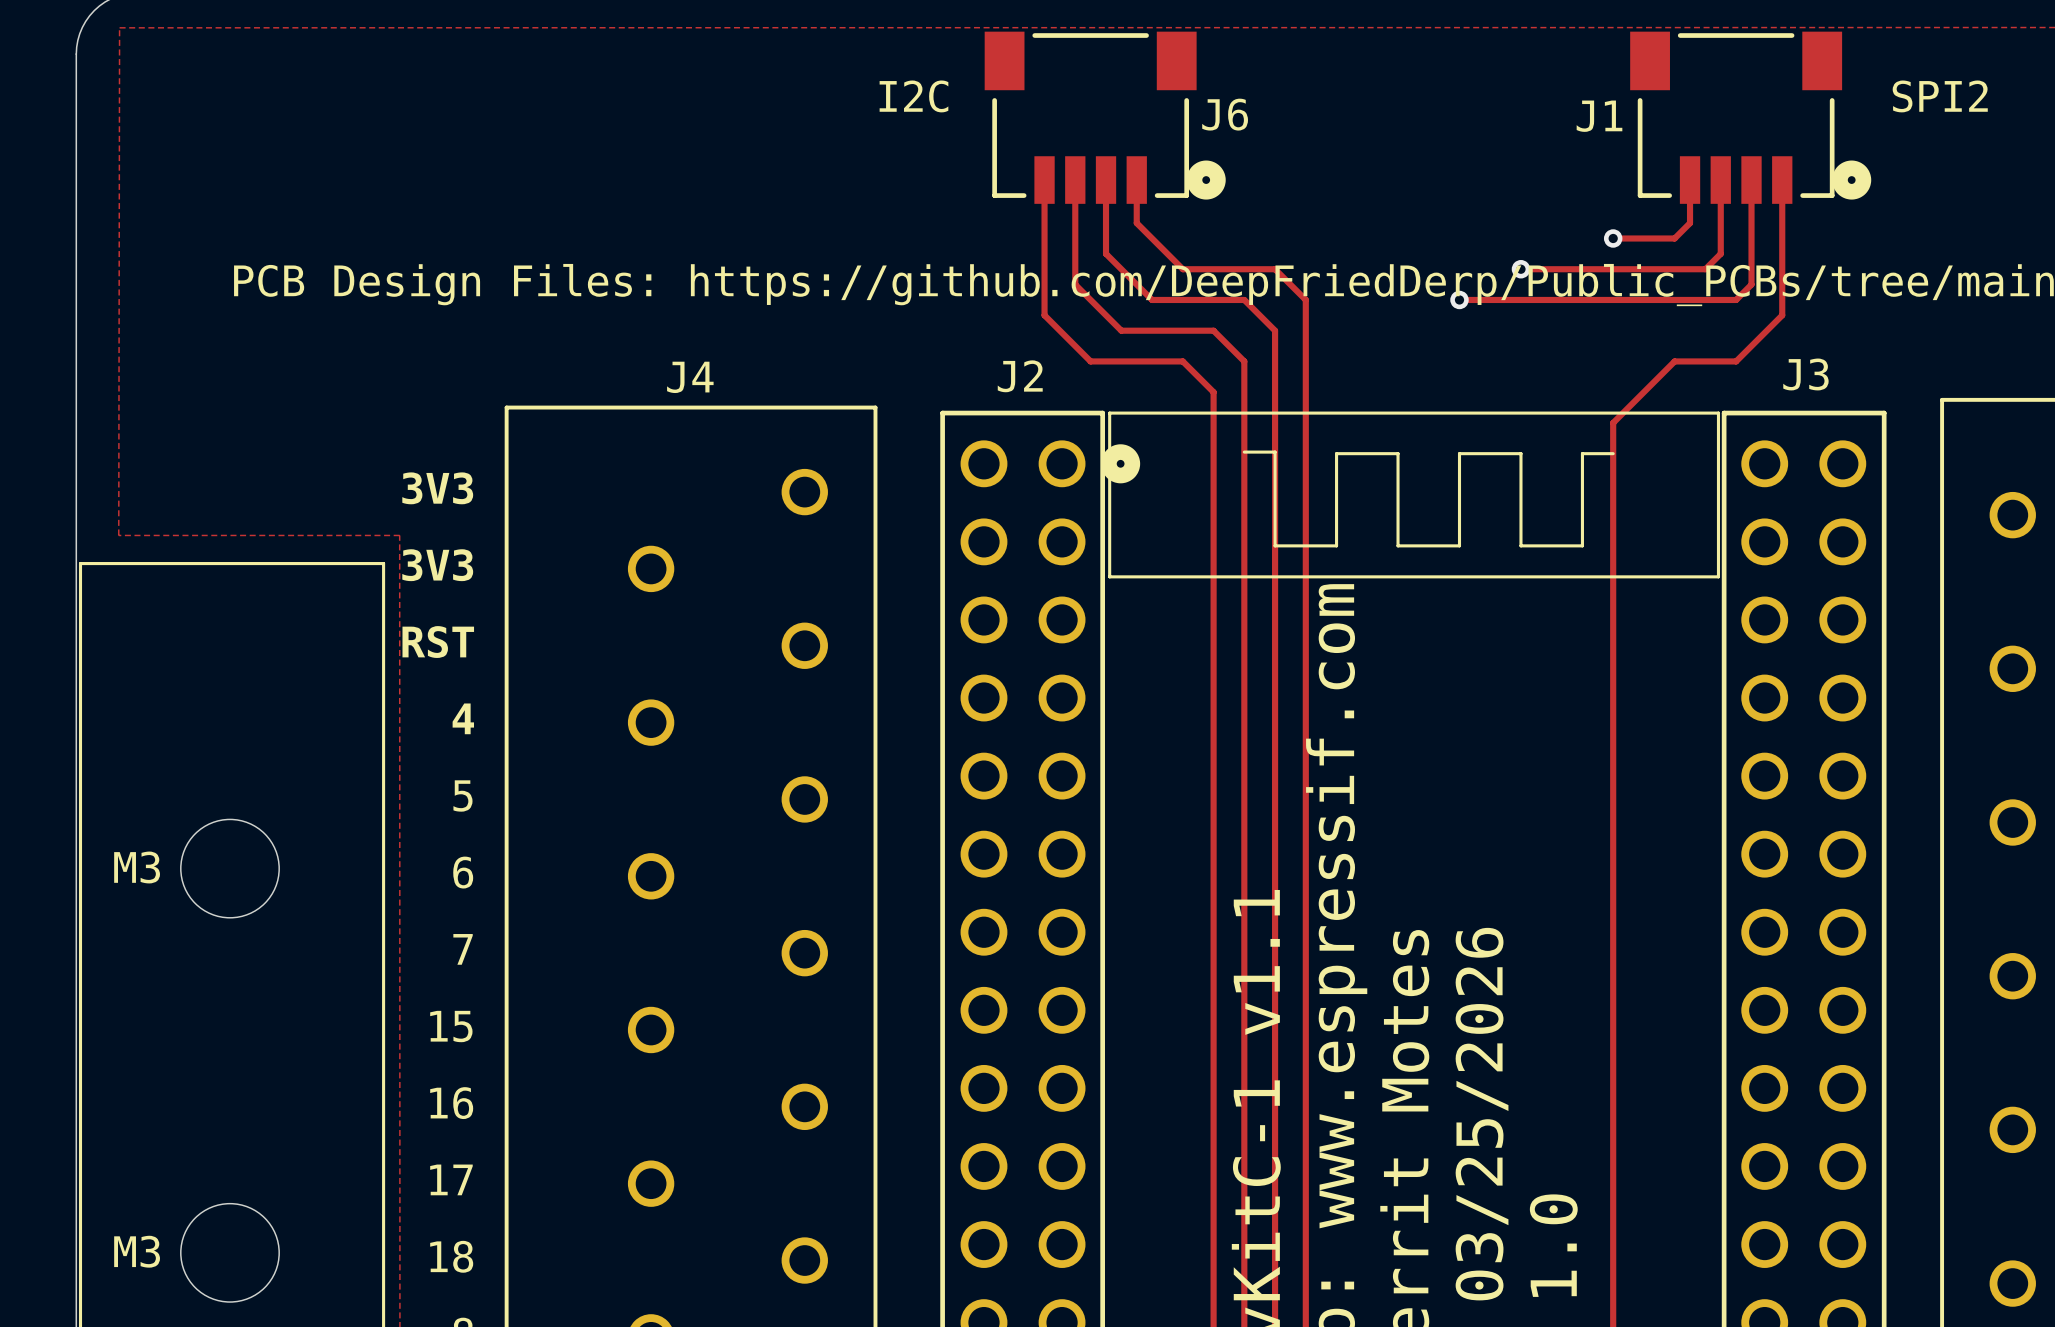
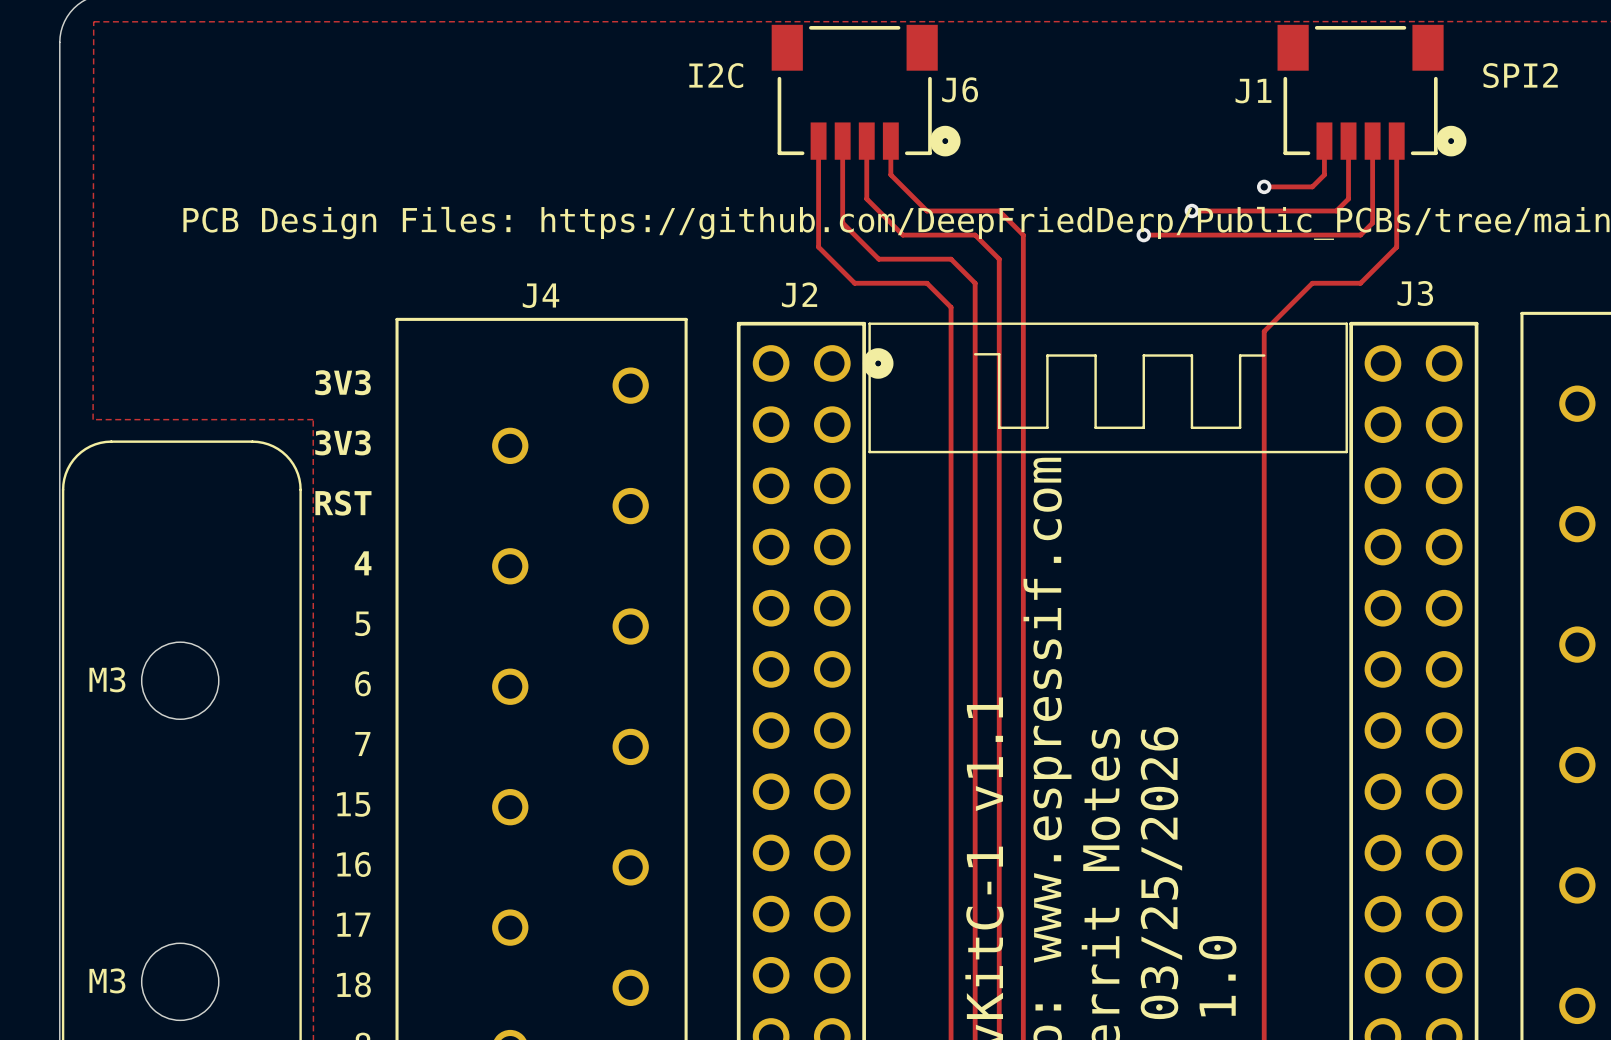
line: (141, 563) (80, 563) (80, 625) -> (111, 441) (95, 444) (77, 455) (65, 473) (63, 489)
line: (322, 563) (383, 563) (383, 625) -> (252, 441) (273, 446) (286, 455) (297, 473) (300, 489)

